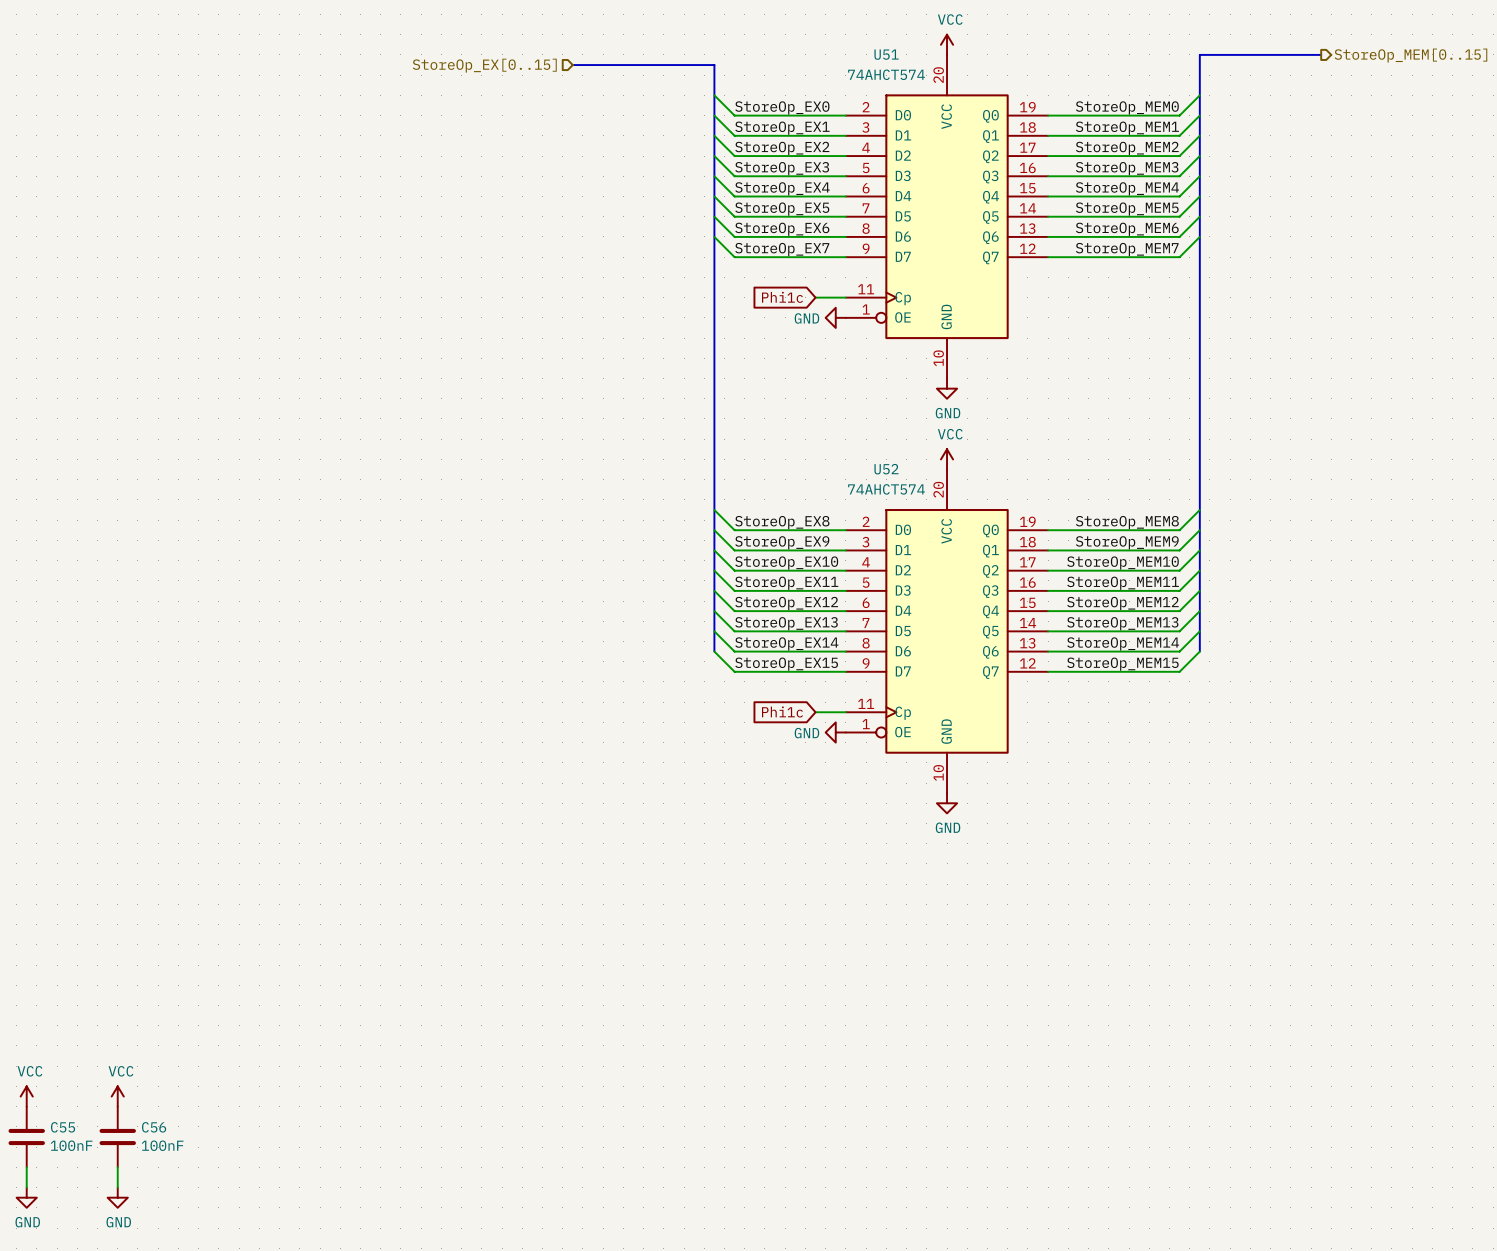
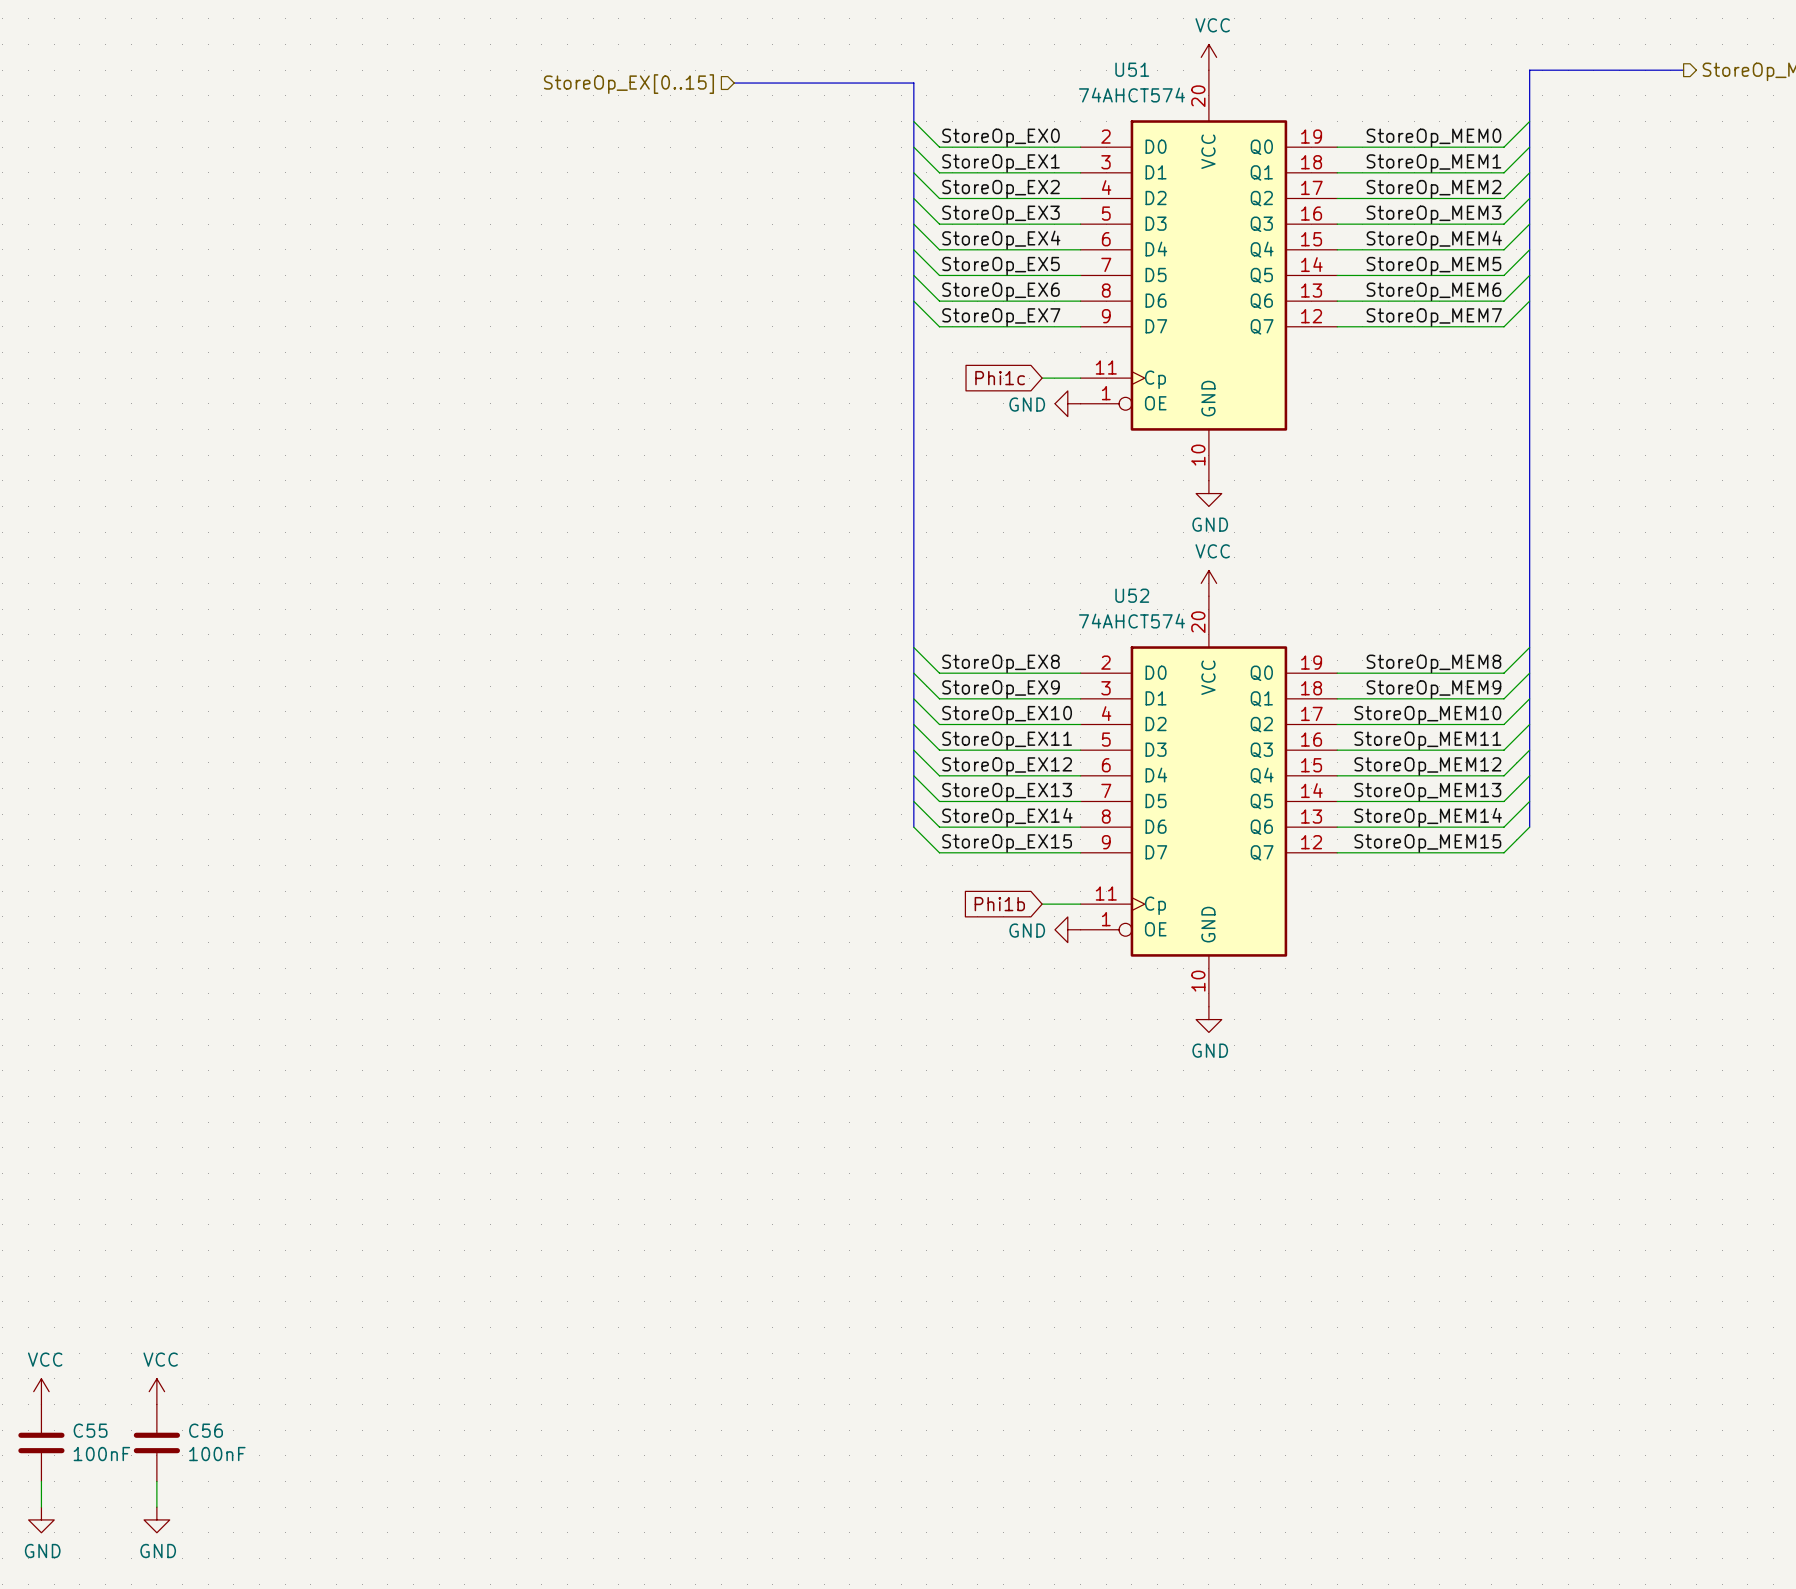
global label: Phi1c (782, 711) -> Phi1b (999, 904)

